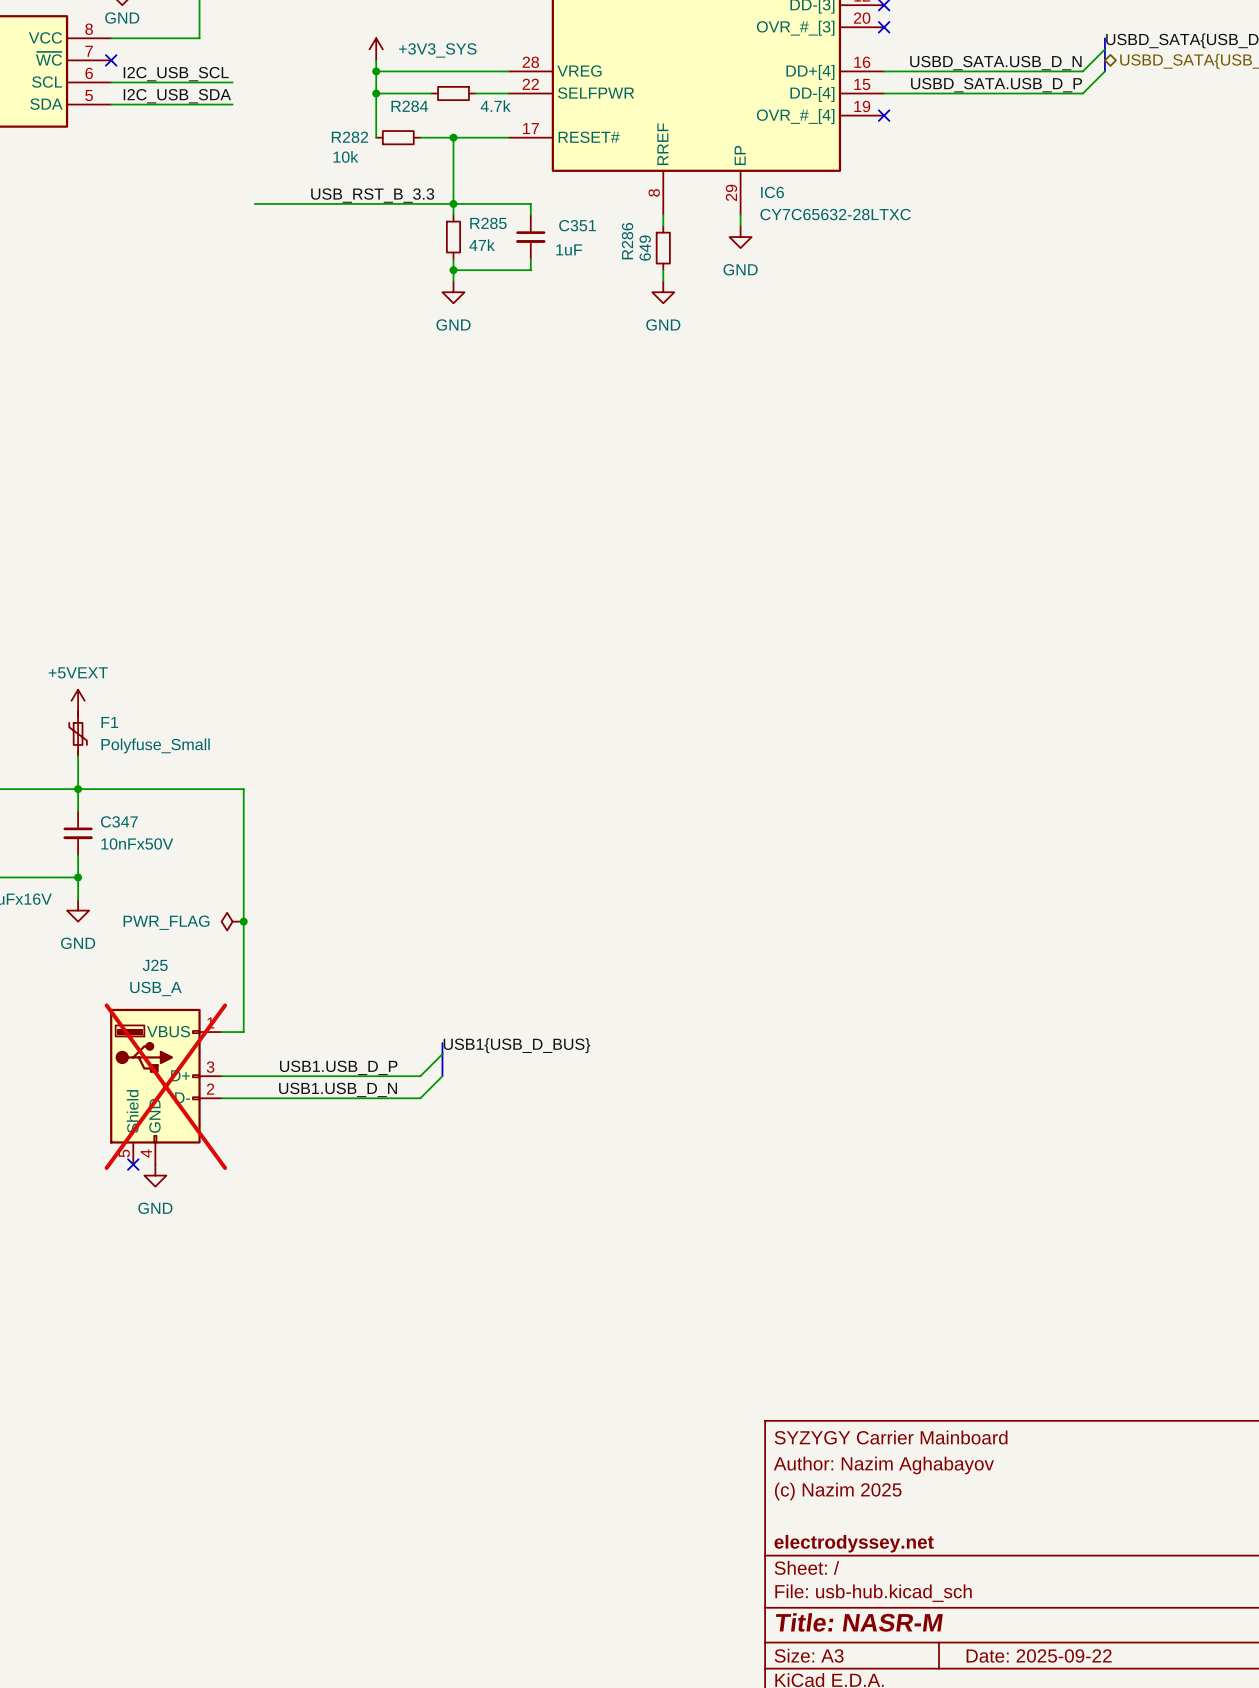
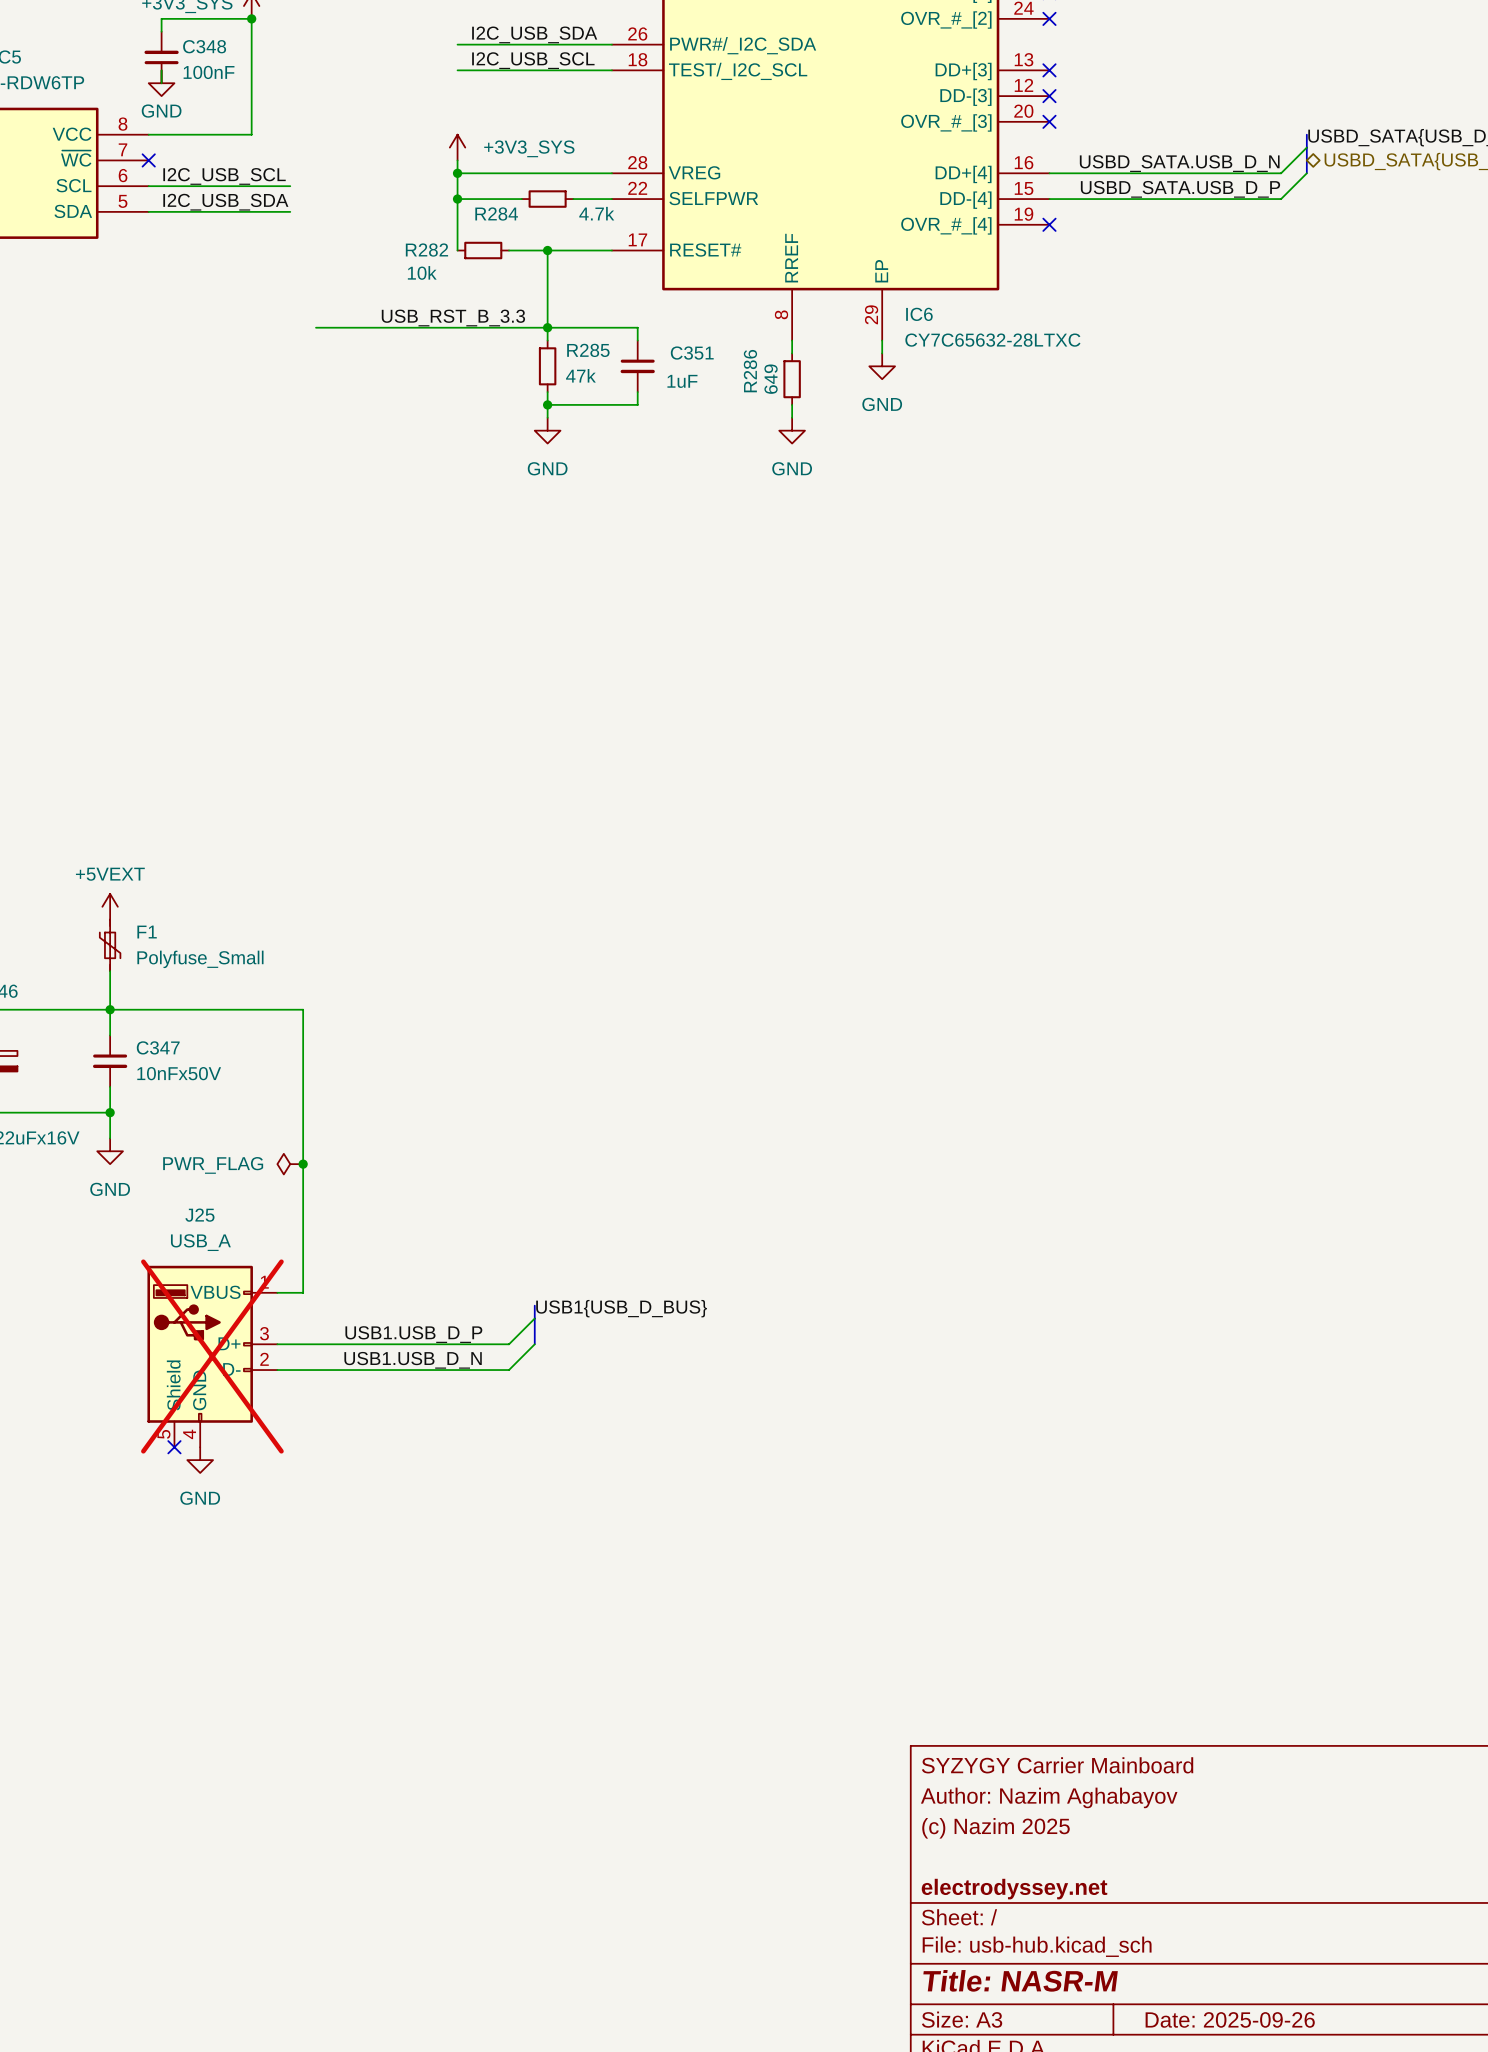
title block: Date: 2025-09-22 (1039, 1655) -> Date: 2025-09-26 (1230, 2019)

